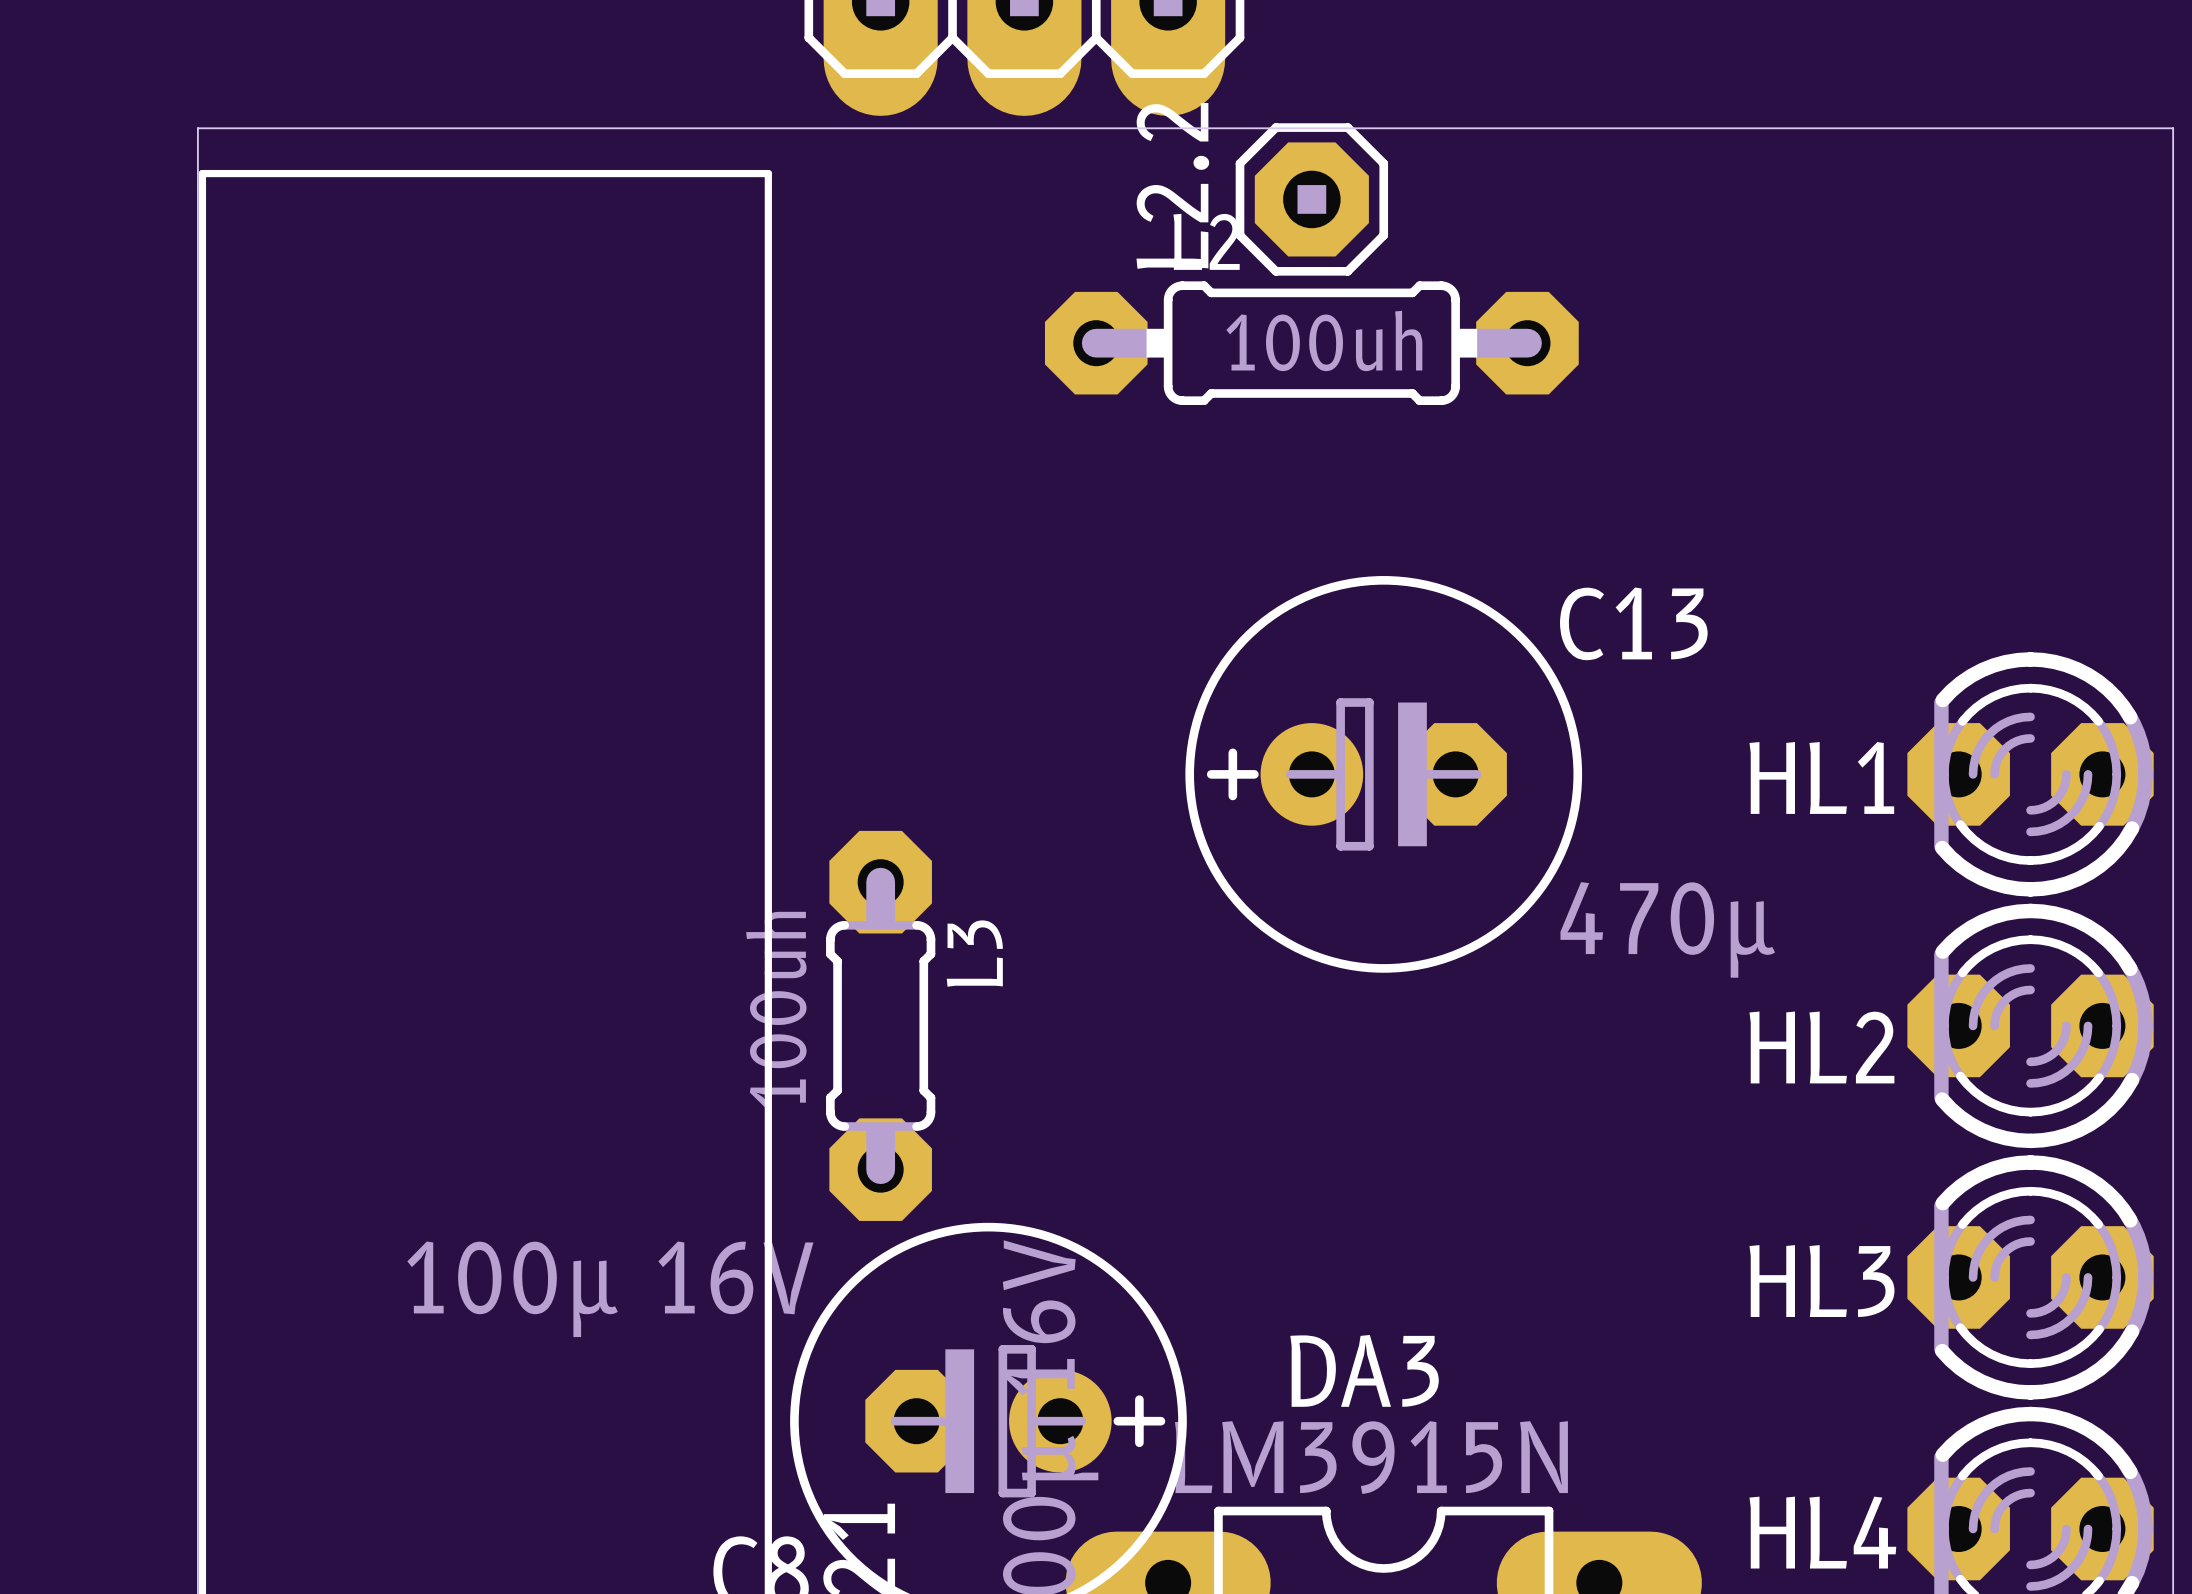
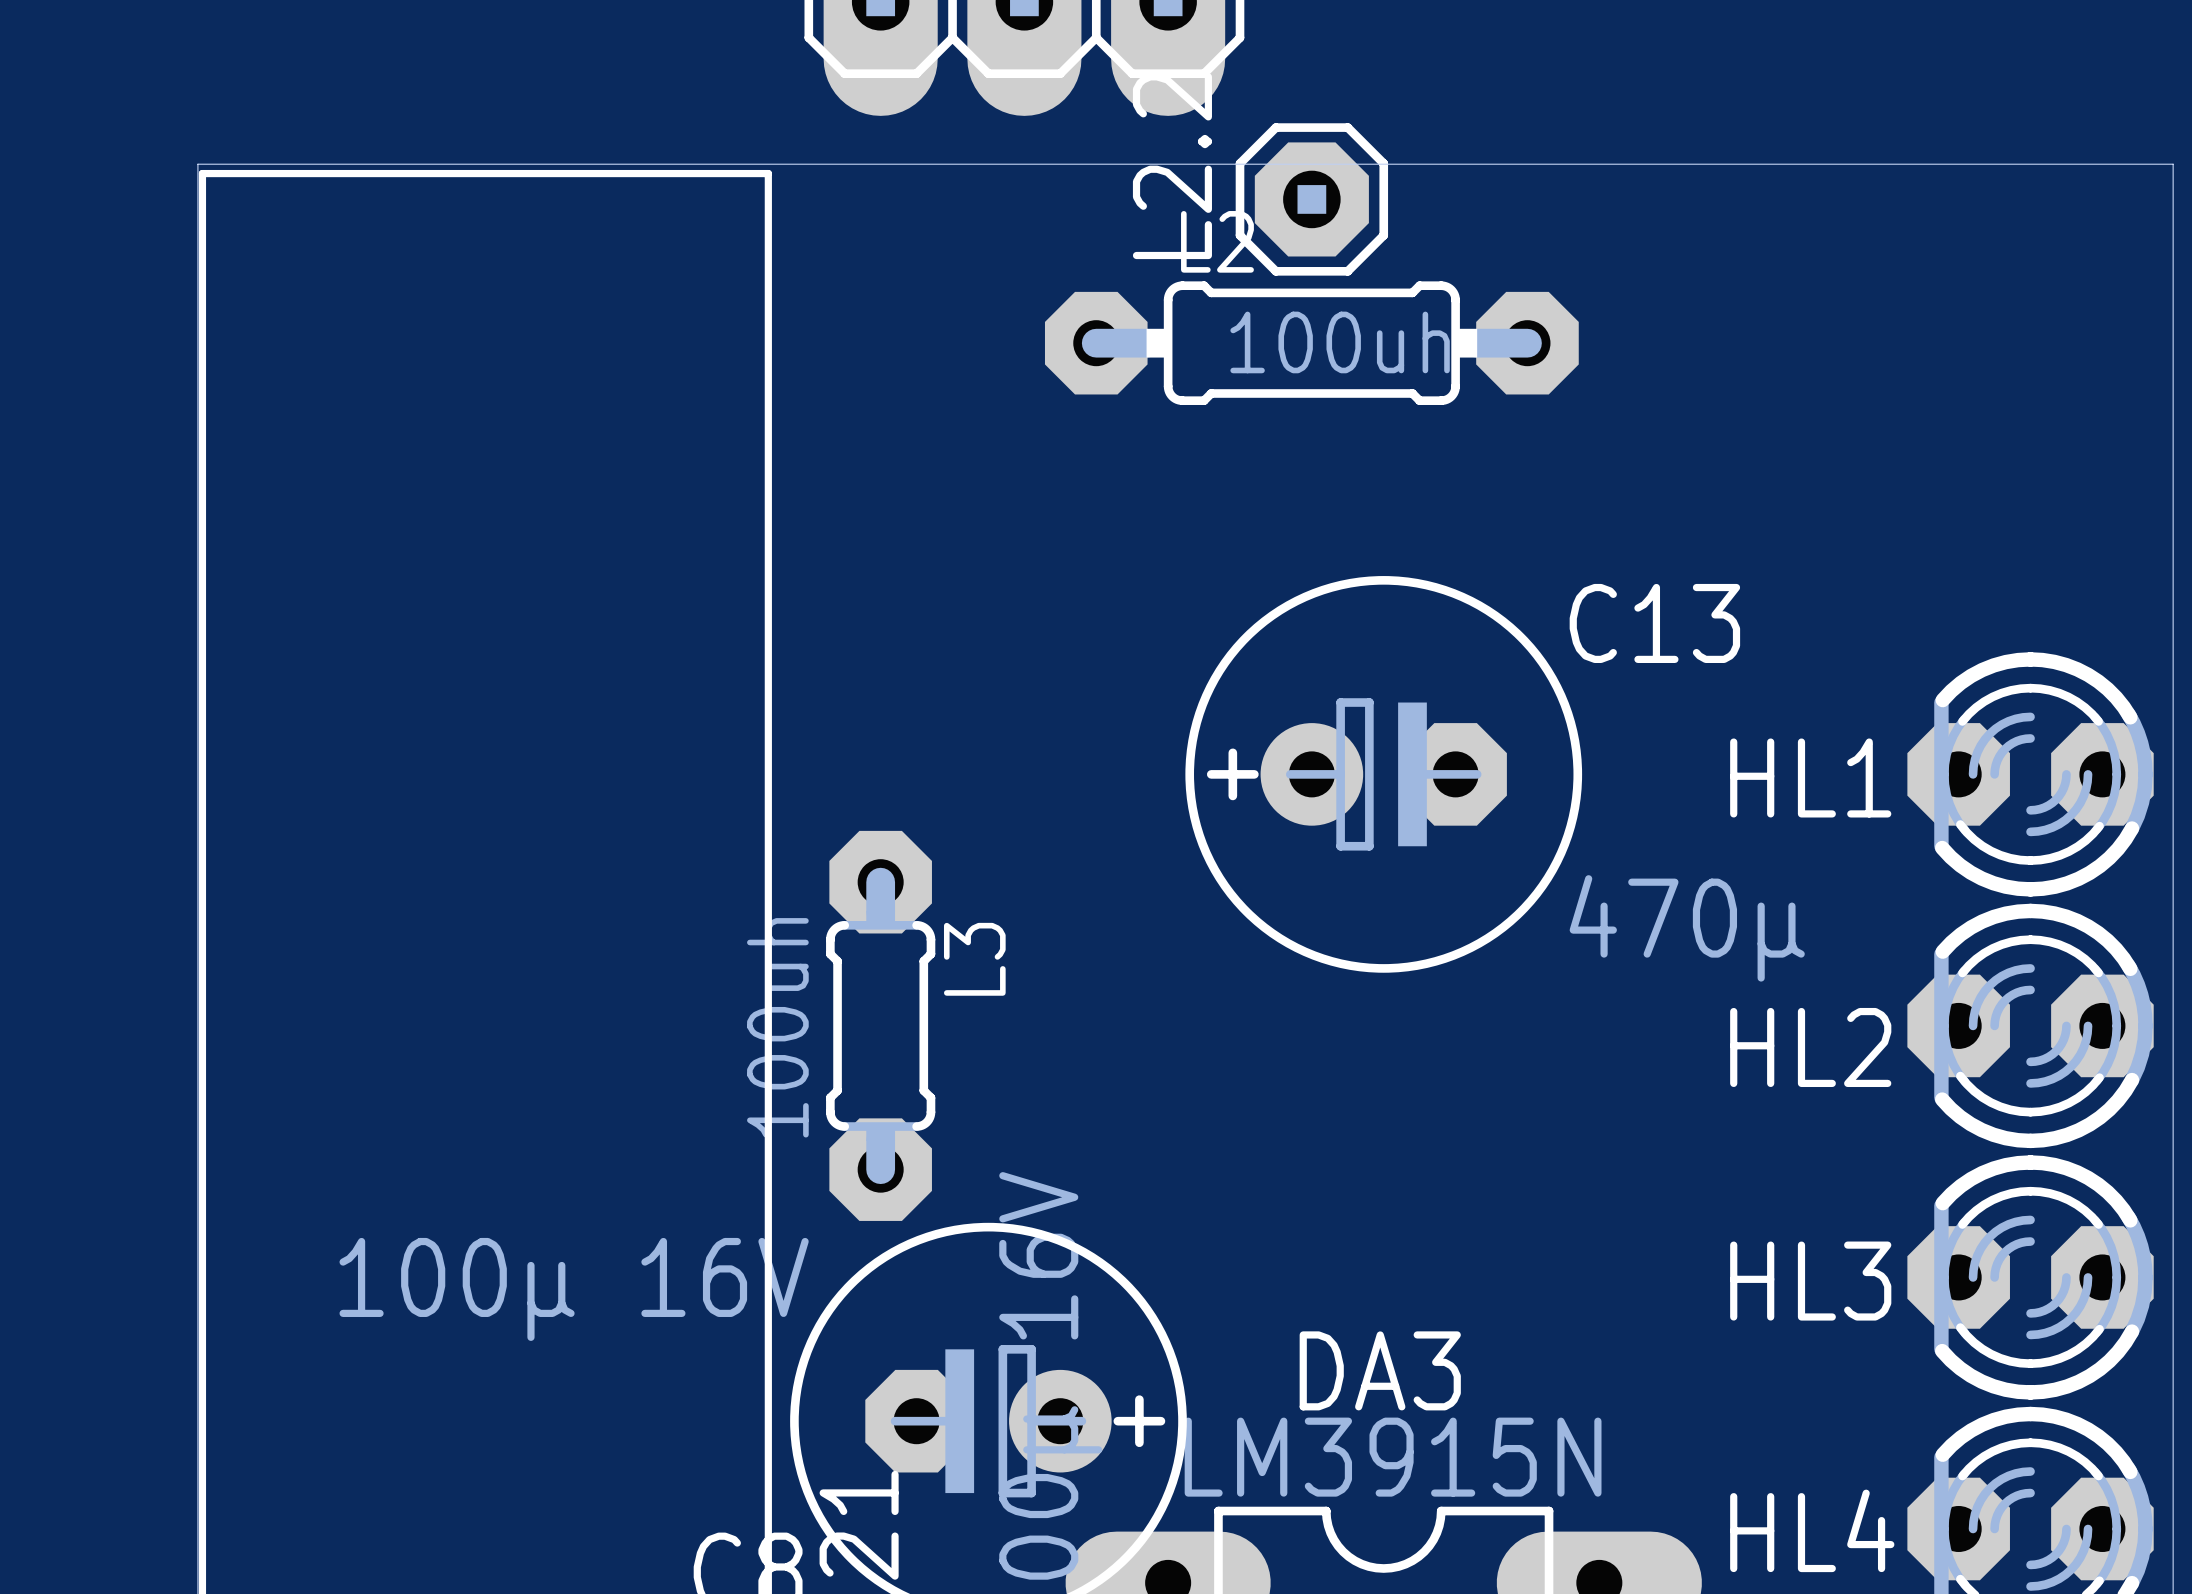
board edge: (197, 164) (197, 128) (2173, 128) (2173, 164) -> (197, 164) (2173, 164)

